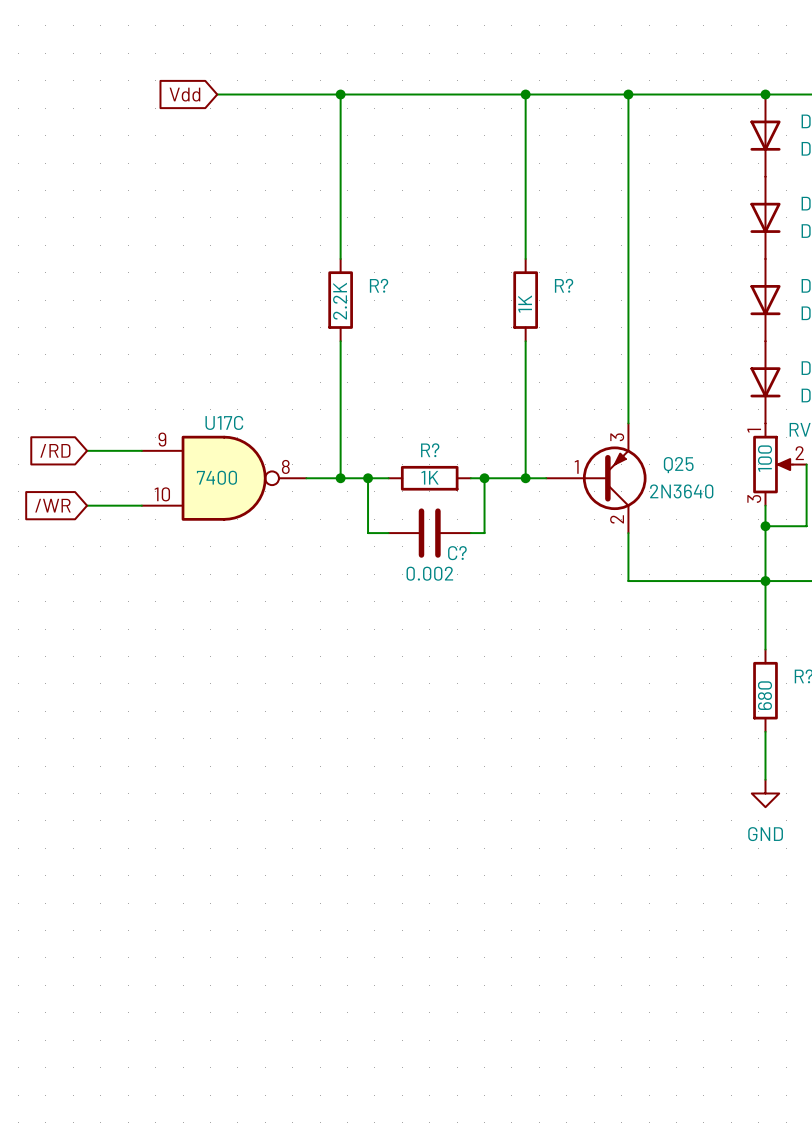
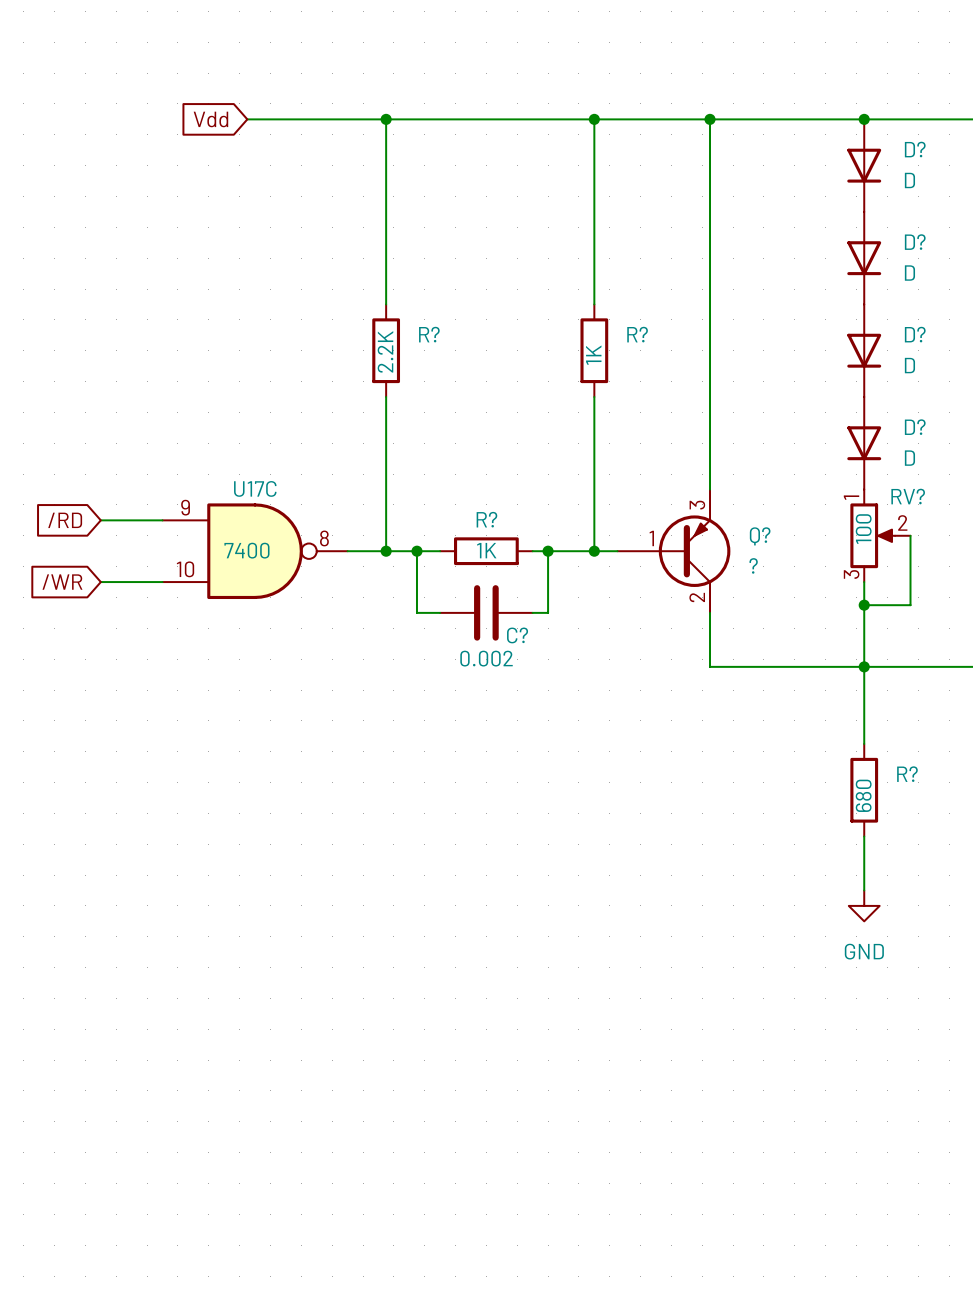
Q25 name: Q25 (678, 465) -> Q? (760, 536)
Q25 value: 2N3640 (681, 491) -> ? (753, 565)

